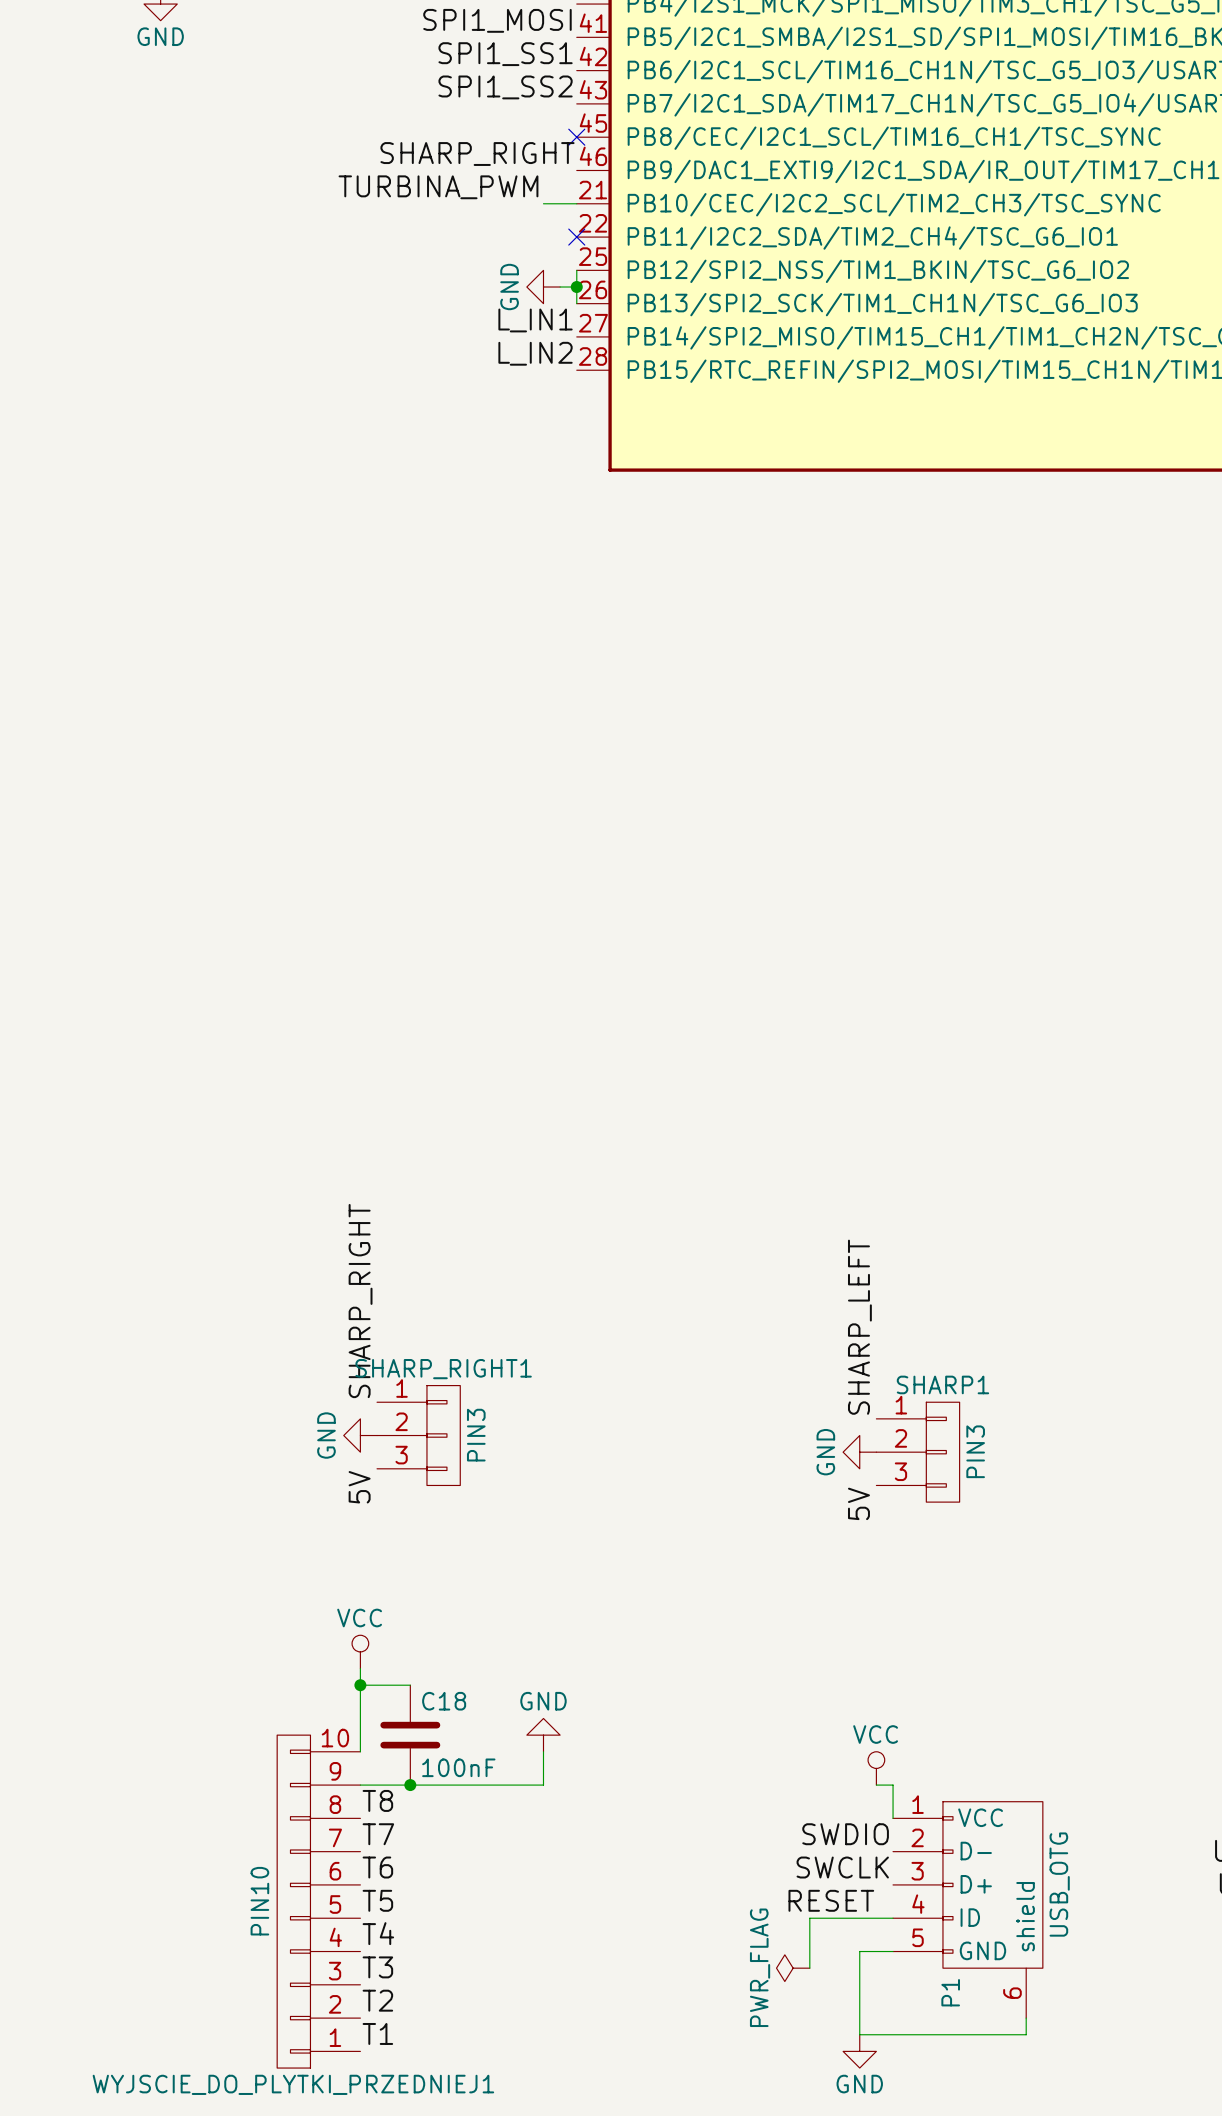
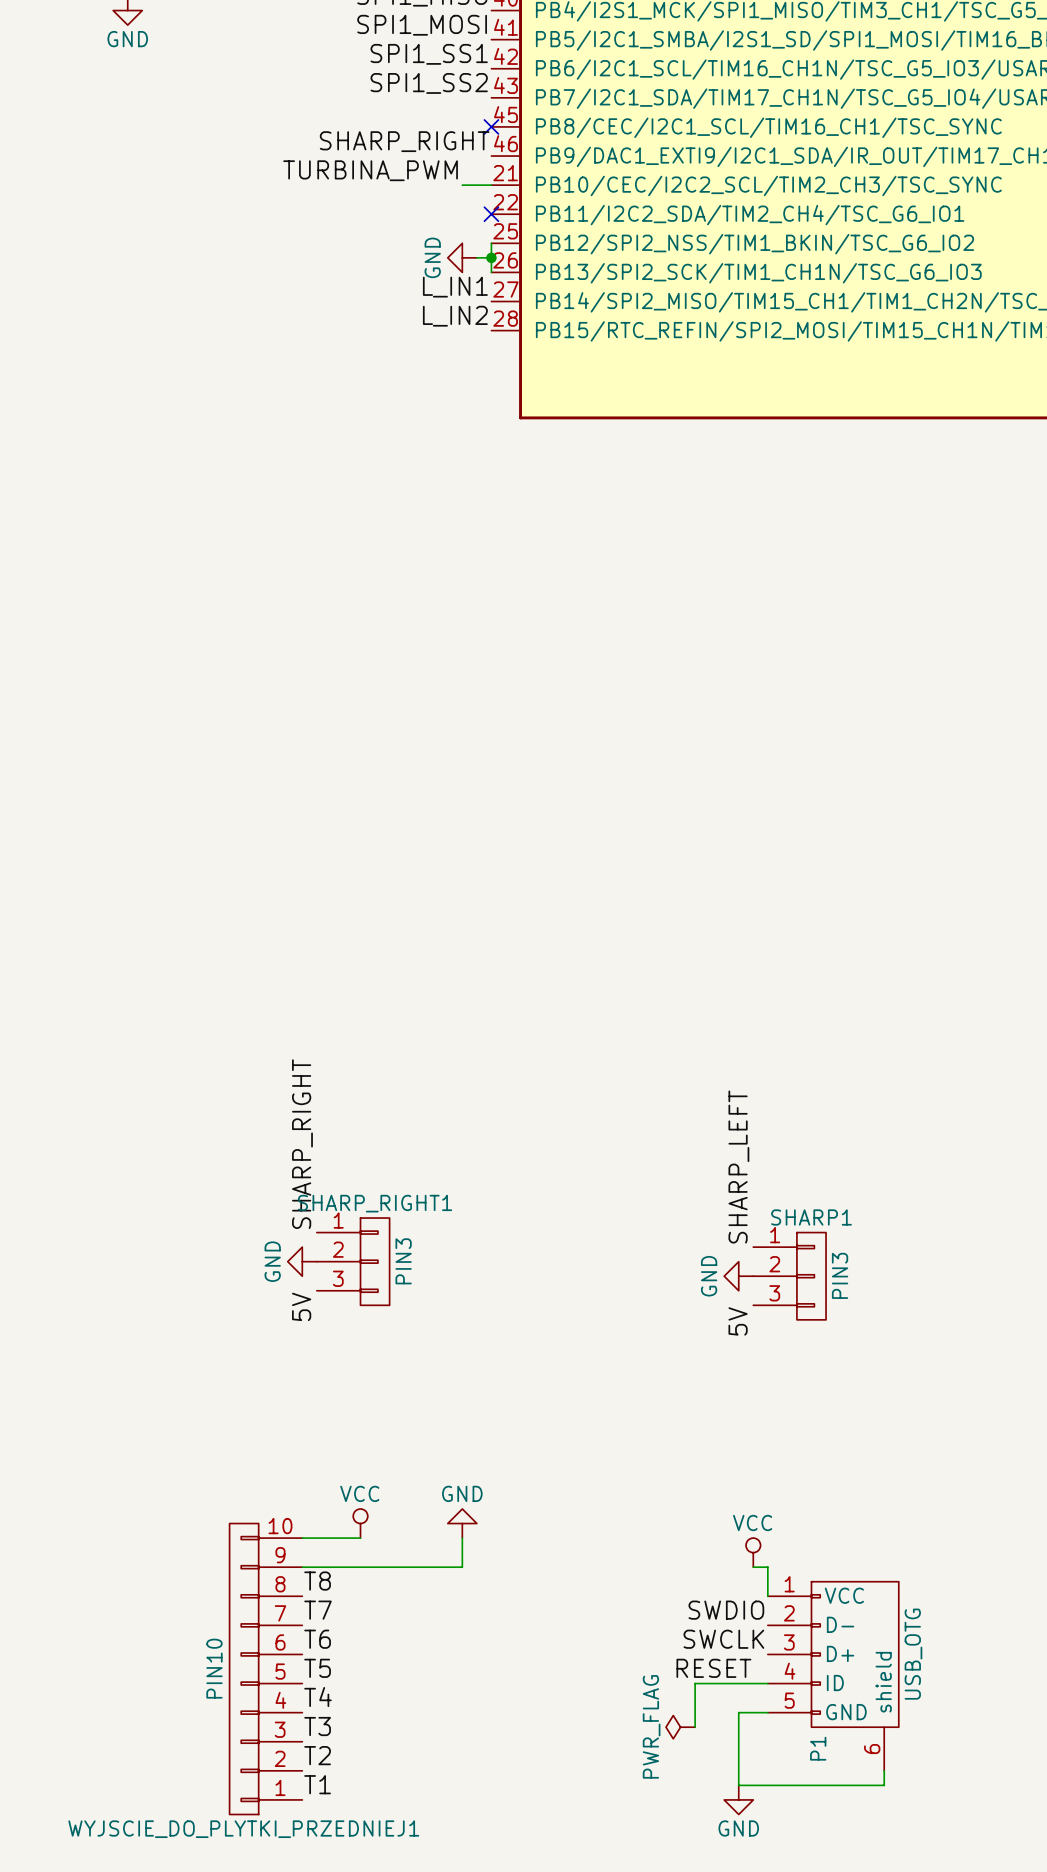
power symbol position: VCC (360, 1651) -> VCC (360, 1523)
wire: (360, 1668) (360, 1751) -> (360, 1538) (302, 1538)
wire: (360, 1685) (410, 1685) -> none
junction: (360, 1685) -> none
C18: 100nF (410, 1735) -> none
junction: (410, 1785) -> none

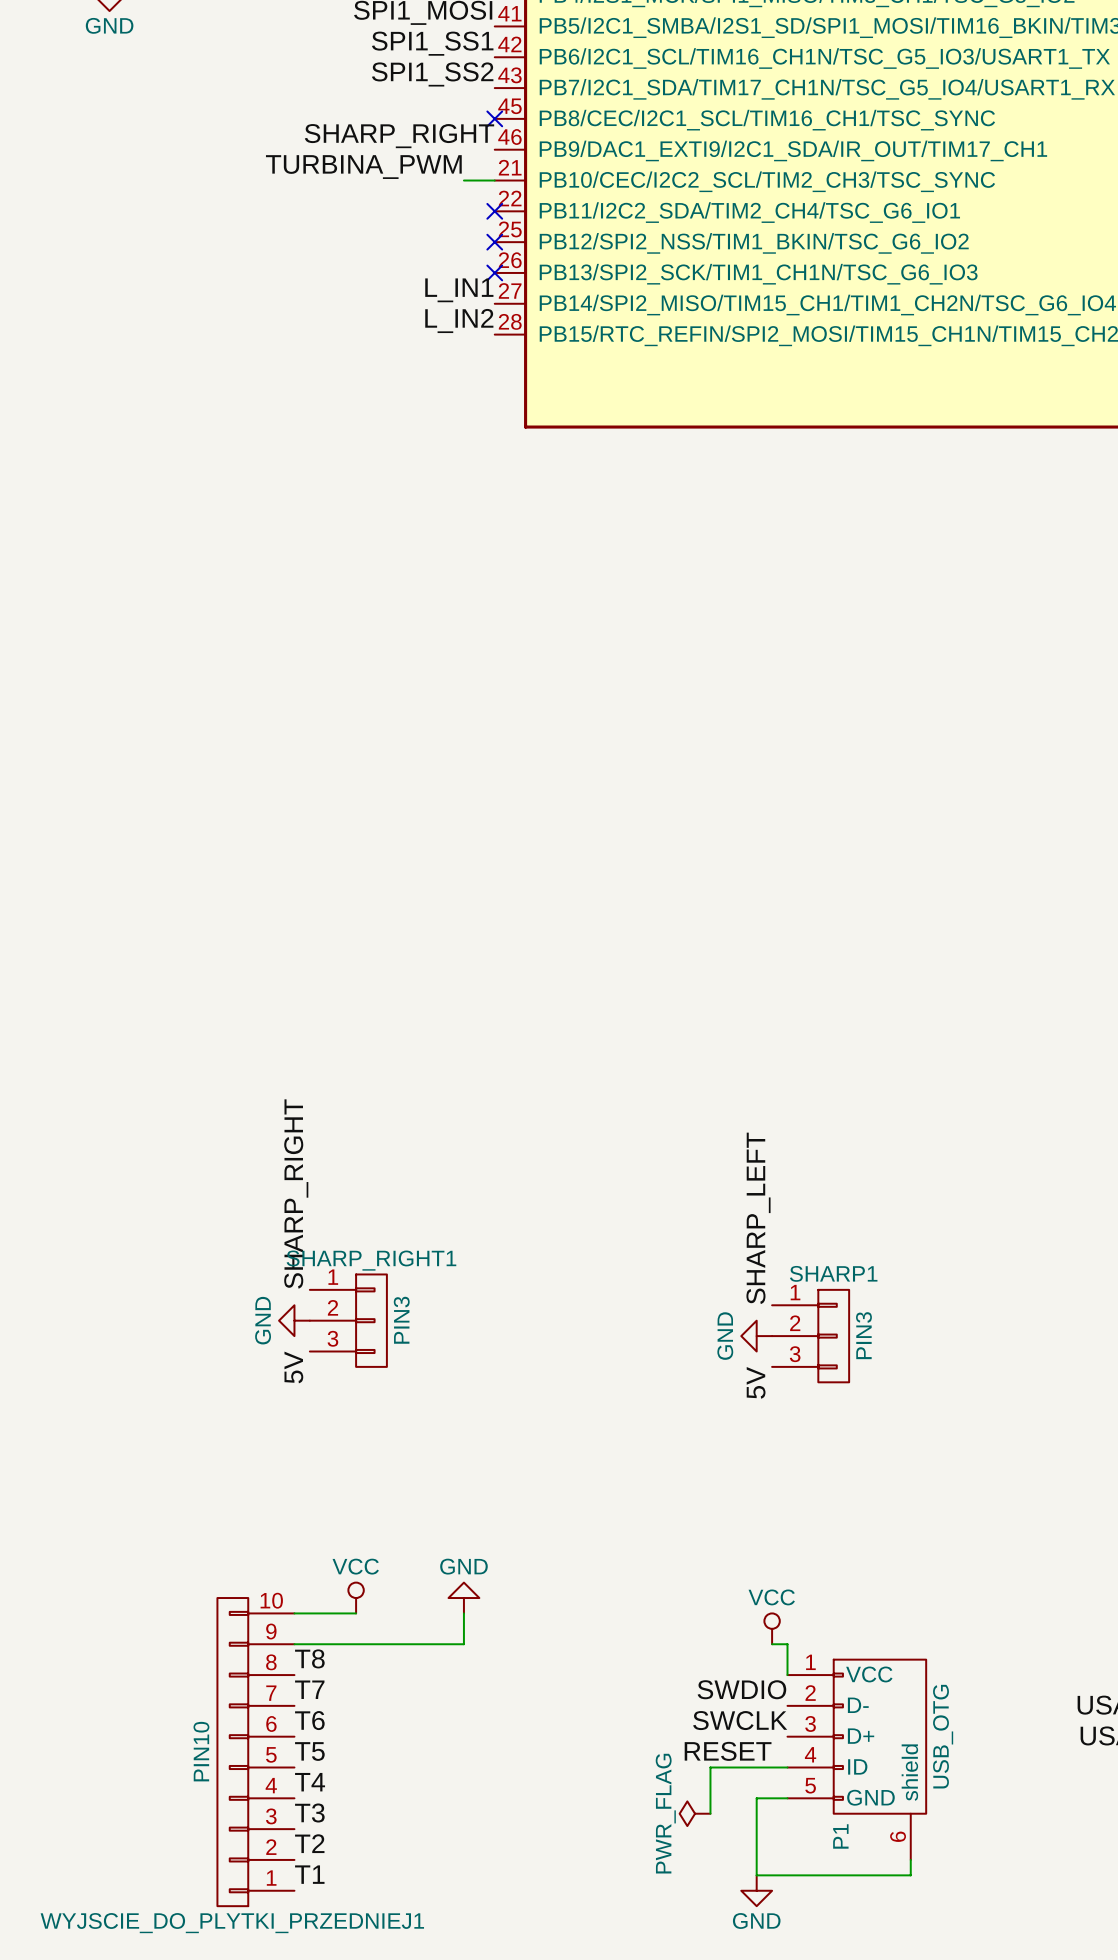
wire: (491, 243) (491, 272) -> none
no-connect mark: none -> (494, 242)
power symbol: GND (462, 257) -> none
wire: (476, 257) (491, 257) -> none
junction: (491, 257) -> none
no-connect mark: none -> (494, 272)

